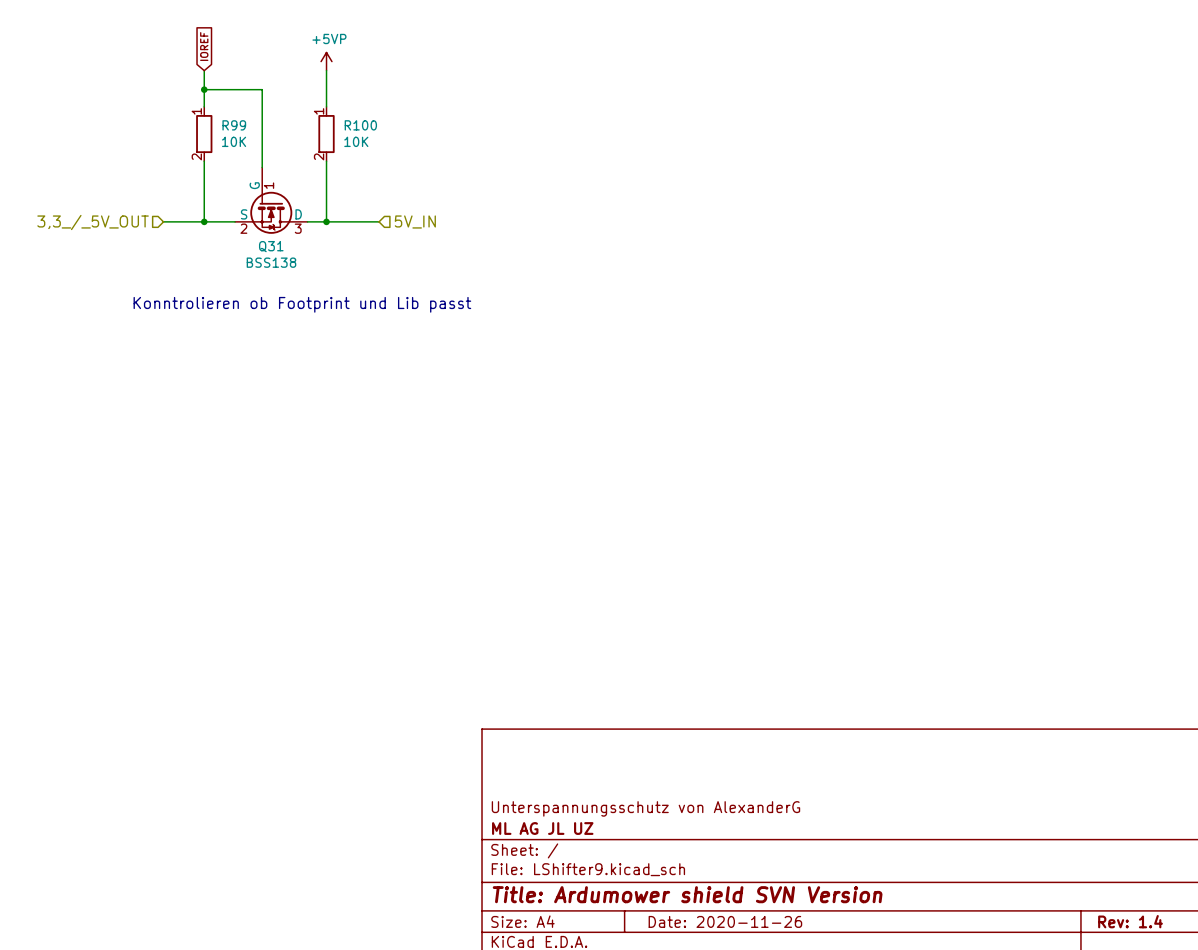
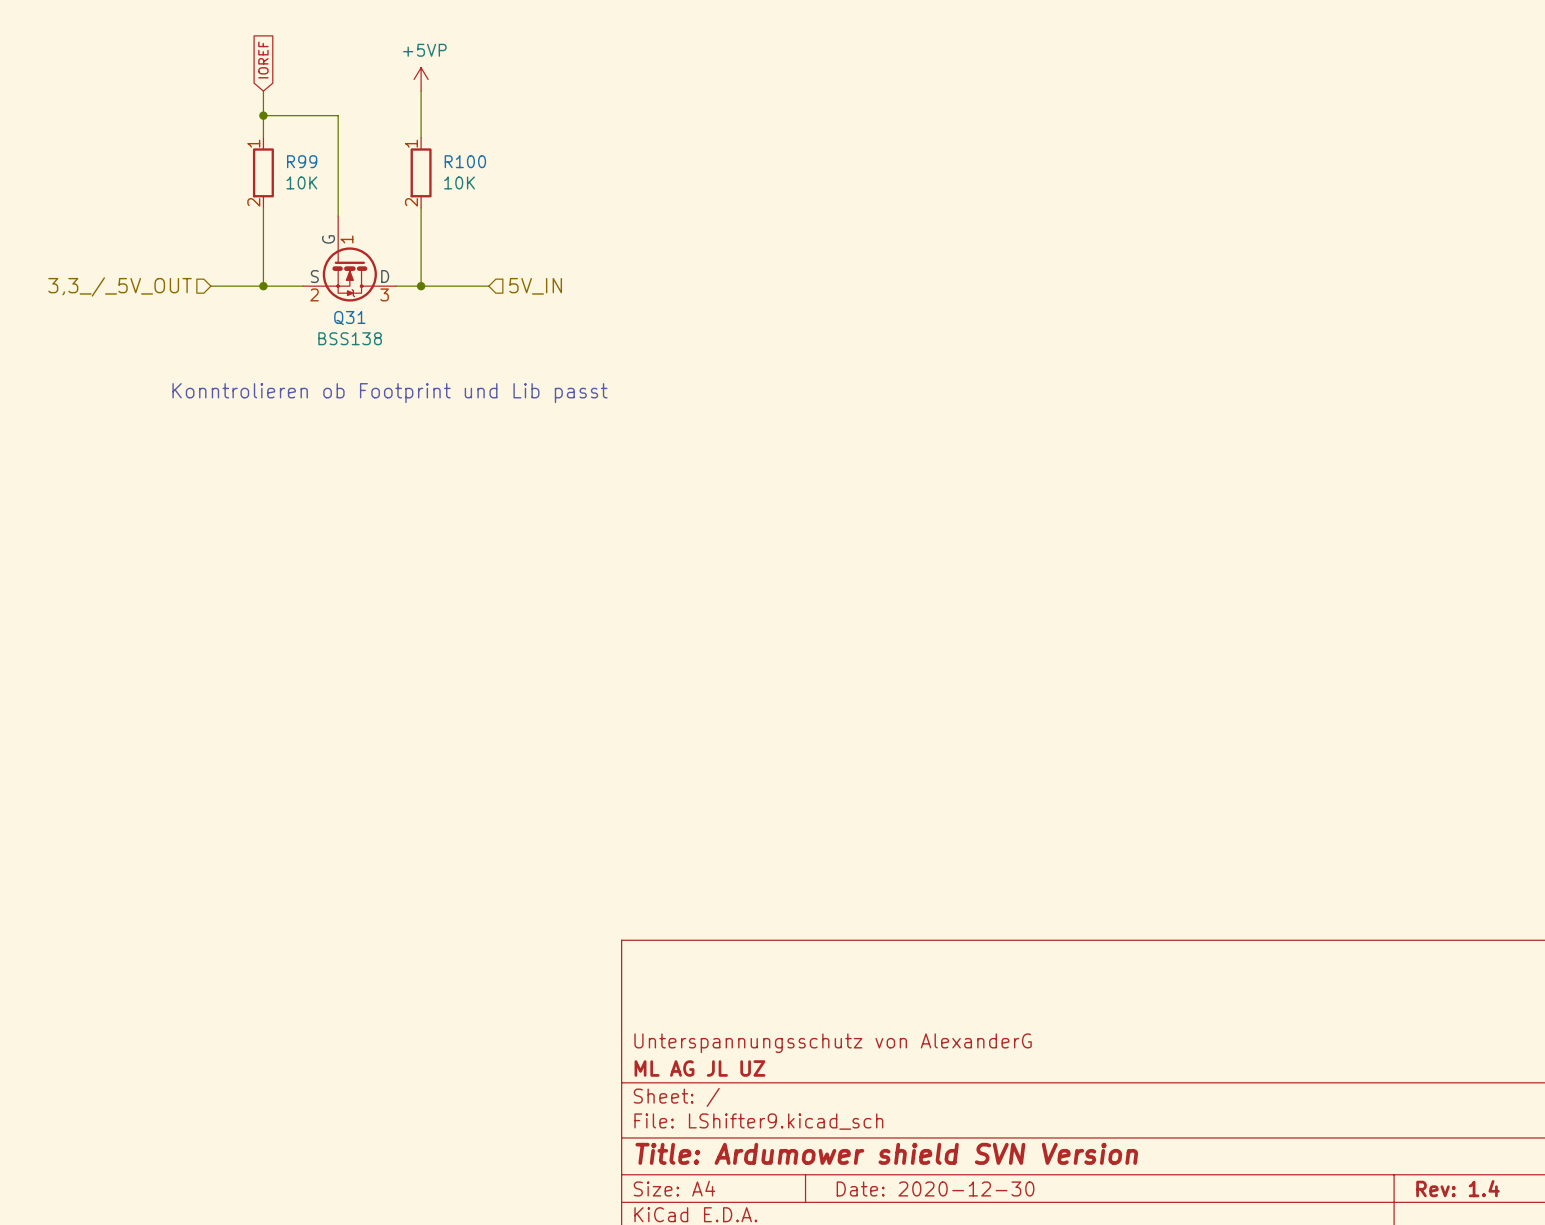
title block: Date: 2020-11-26 (725, 921) -> Date: 2020-12-30 (935, 1188)

